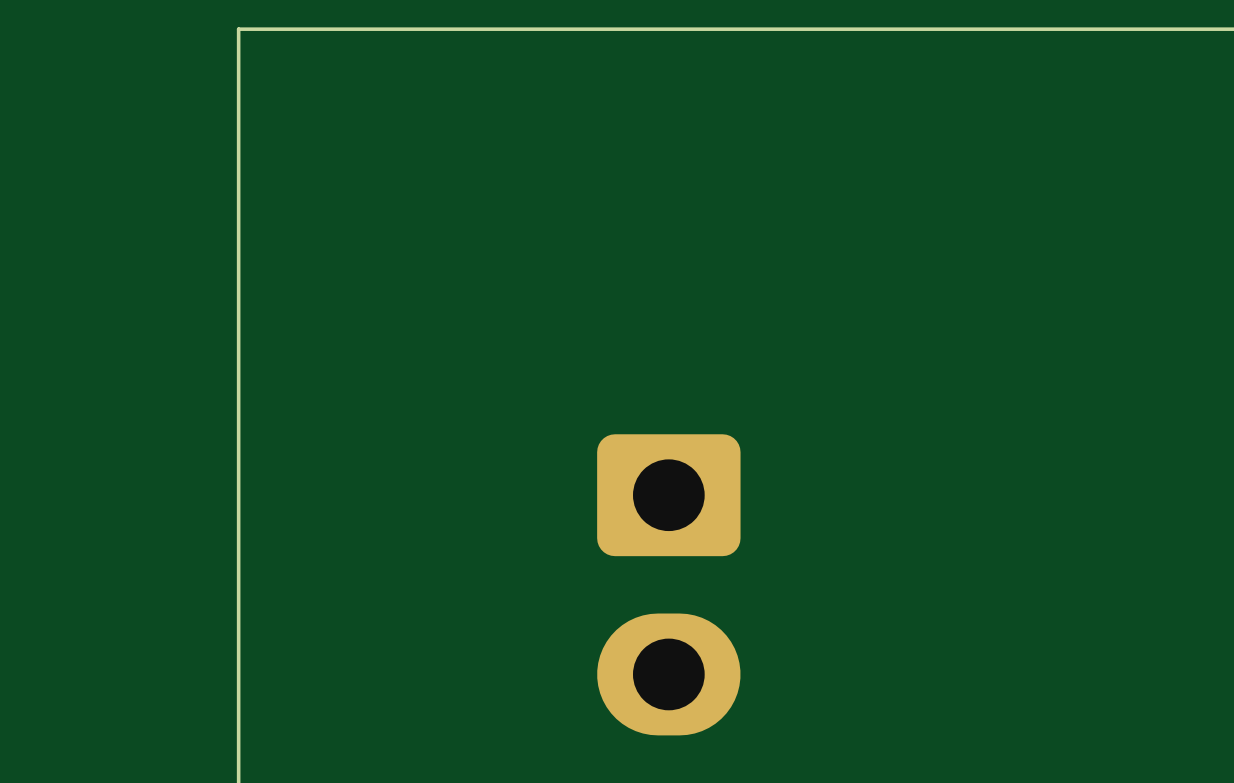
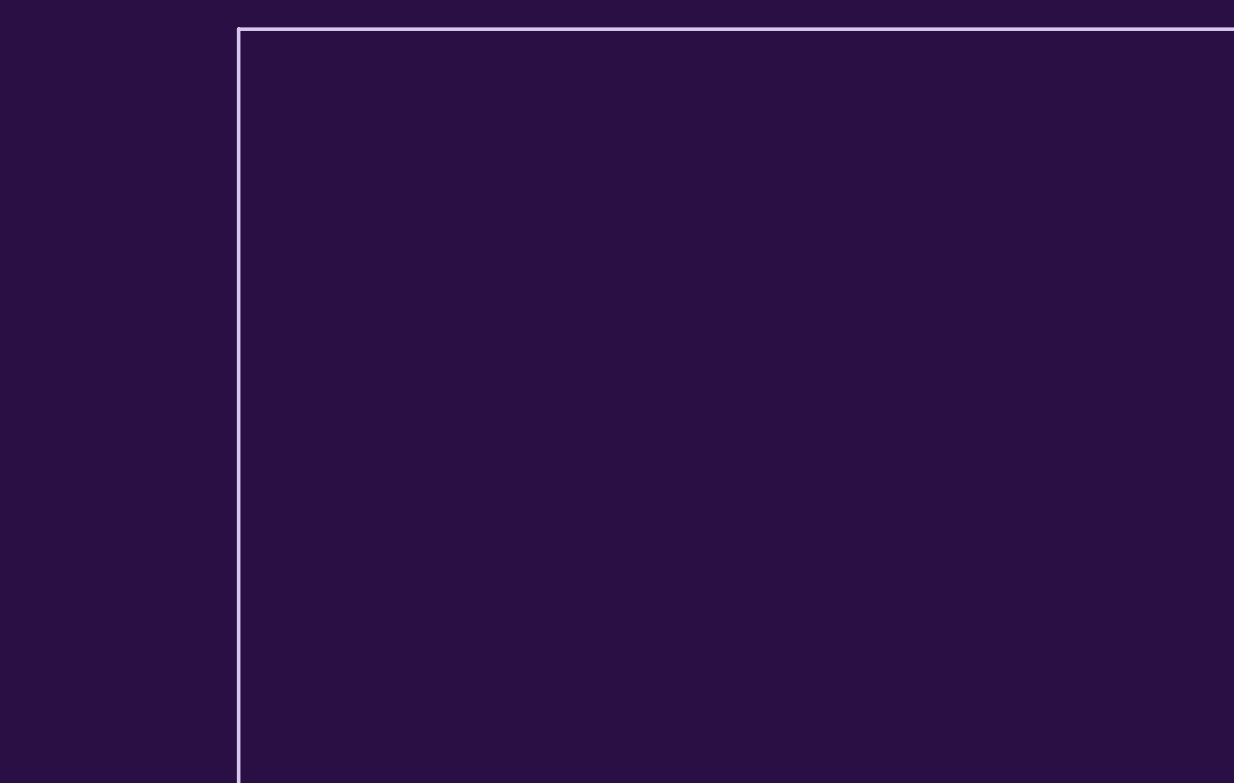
part: (668, 584) -> none

